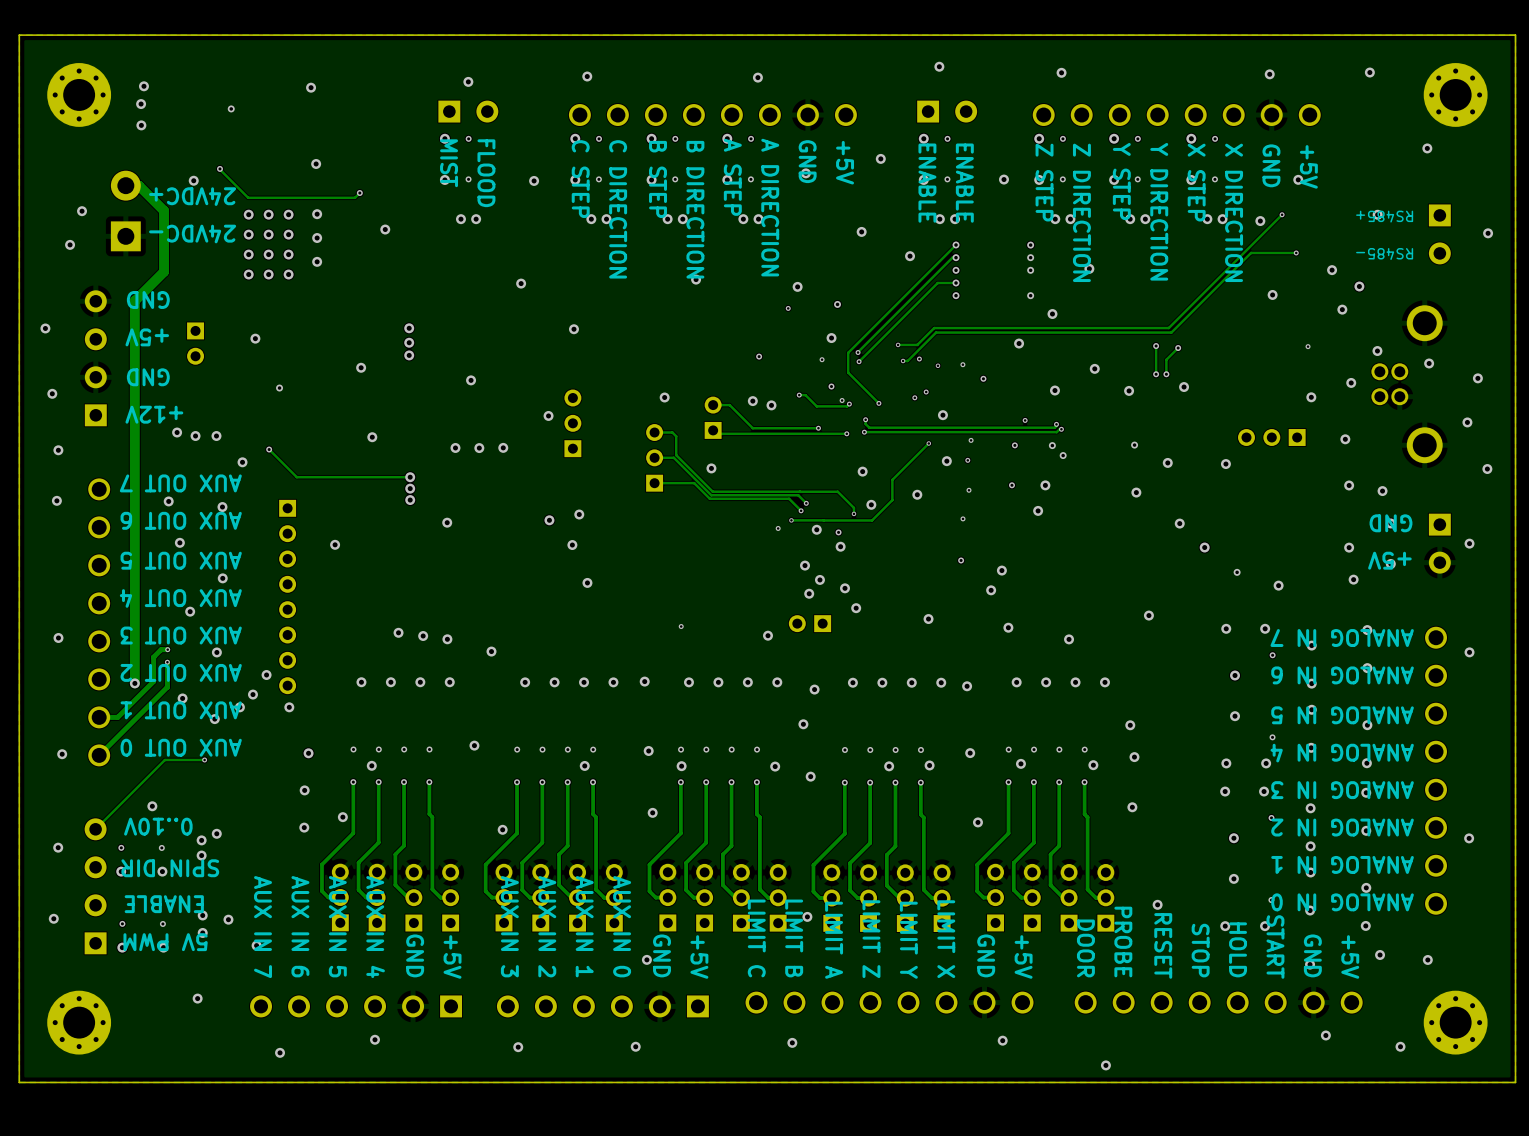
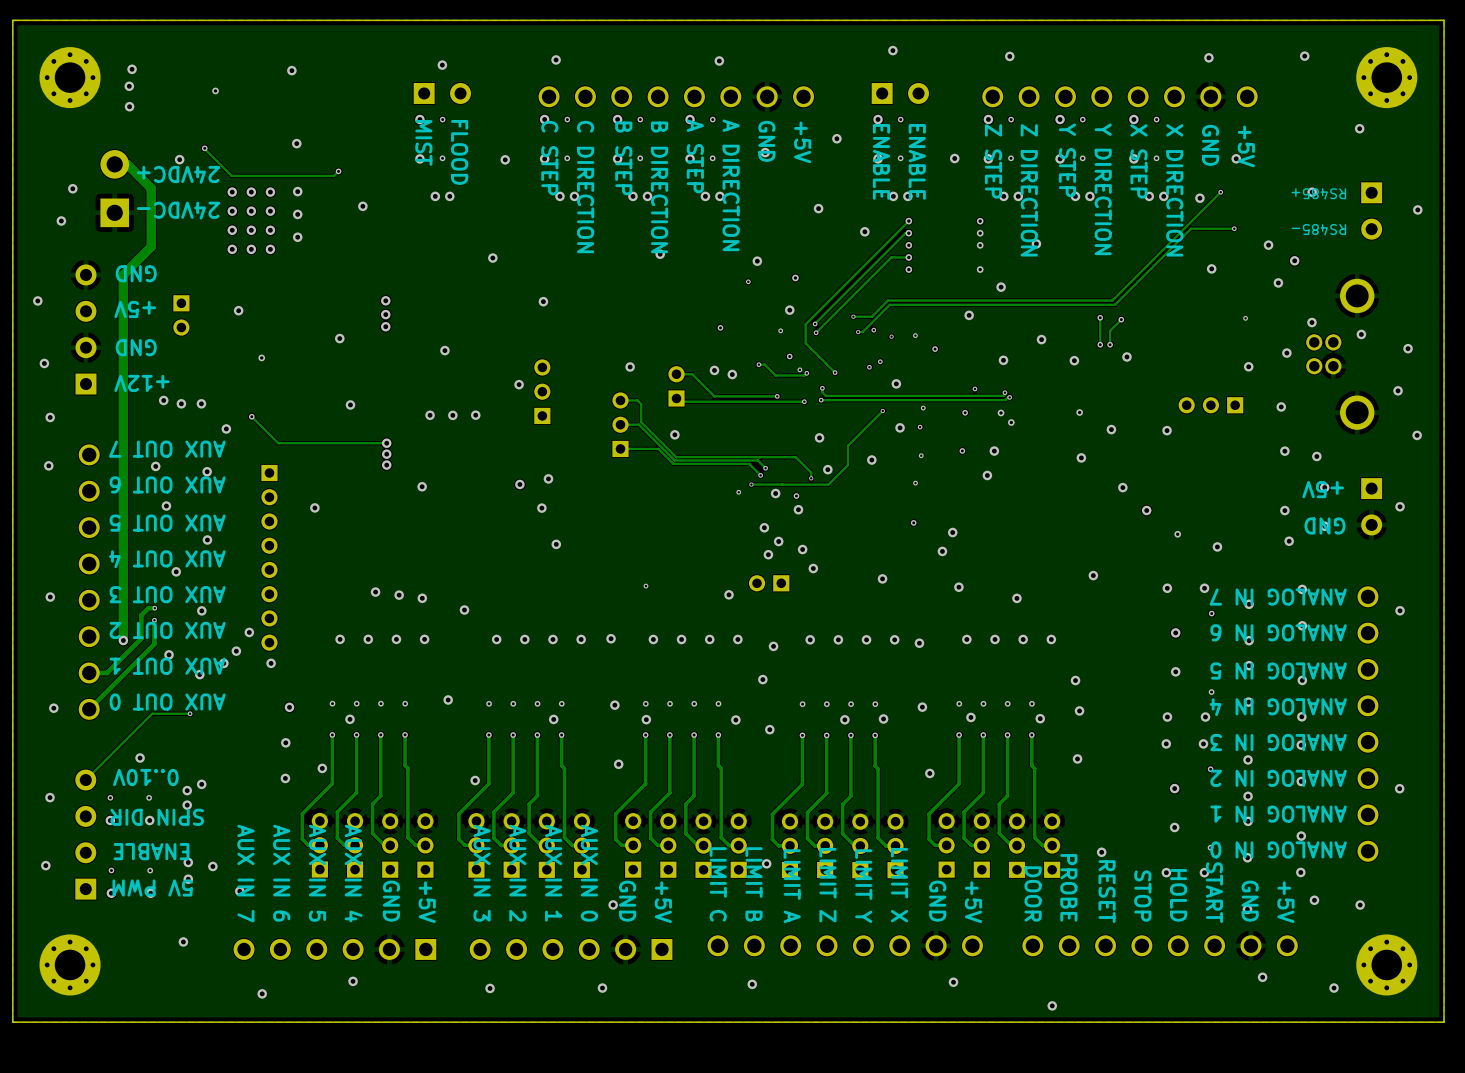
text position: GND (1390, 523) -> GND (1325, 525)
text position: +5V (1389, 560) -> +5V (1323, 489)

